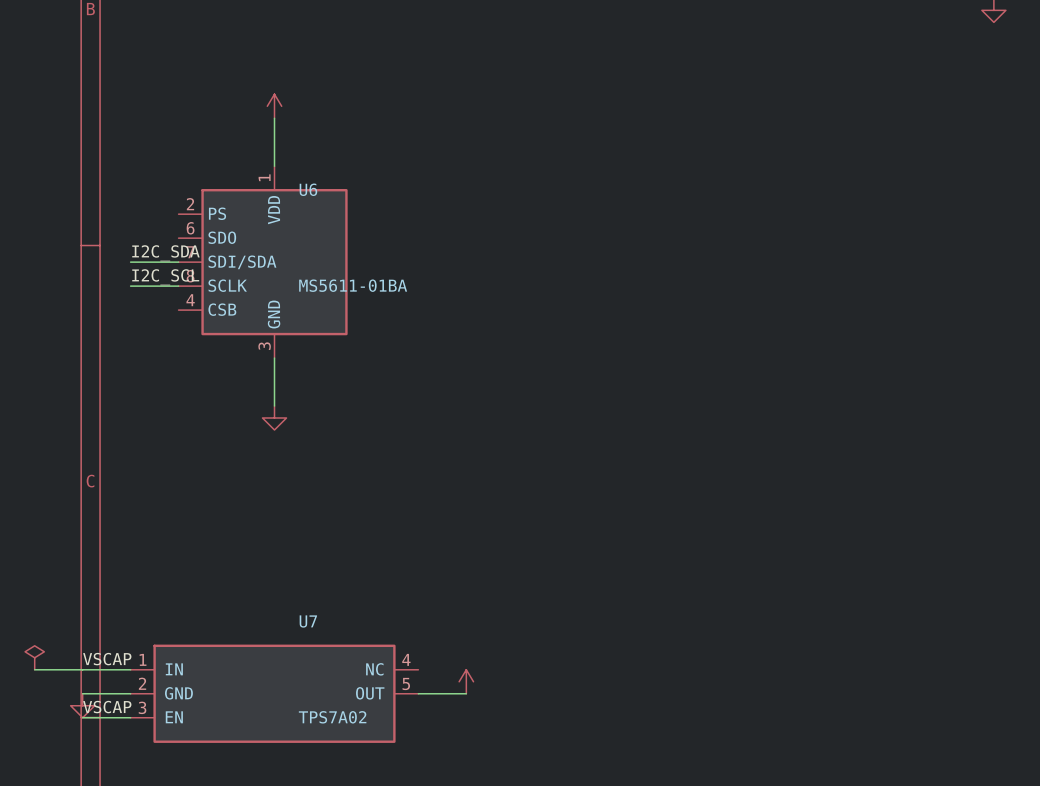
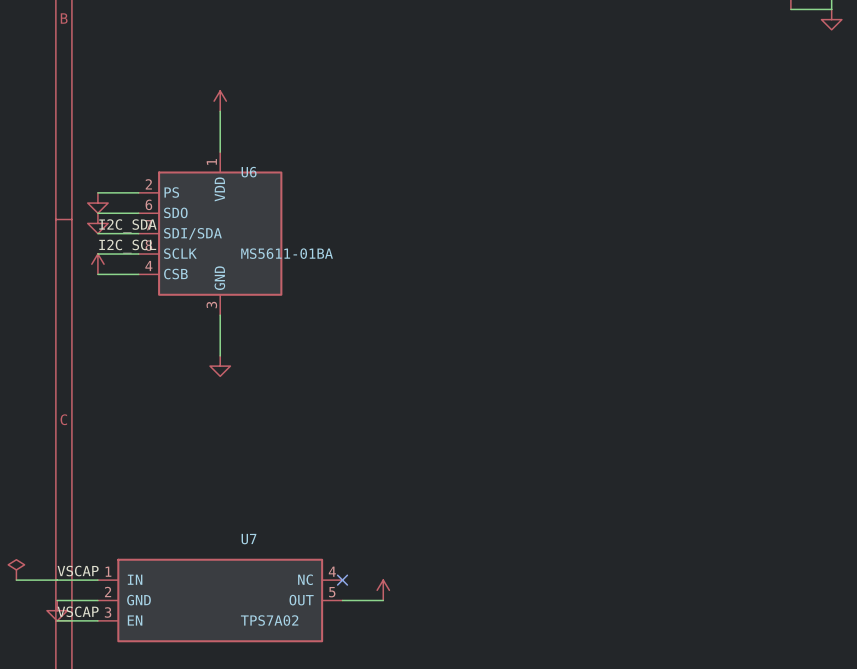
wire: none -> (97, 192) (138, 192)
power symbol: none -> (97, 203)
wire: none -> (97, 213) (138, 213)
power symbol: none -> (97, 223)
power symbol: none -> (97, 264)
wire: none -> (97, 274) (138, 274)
no-connect mark: none -> (342, 580)

